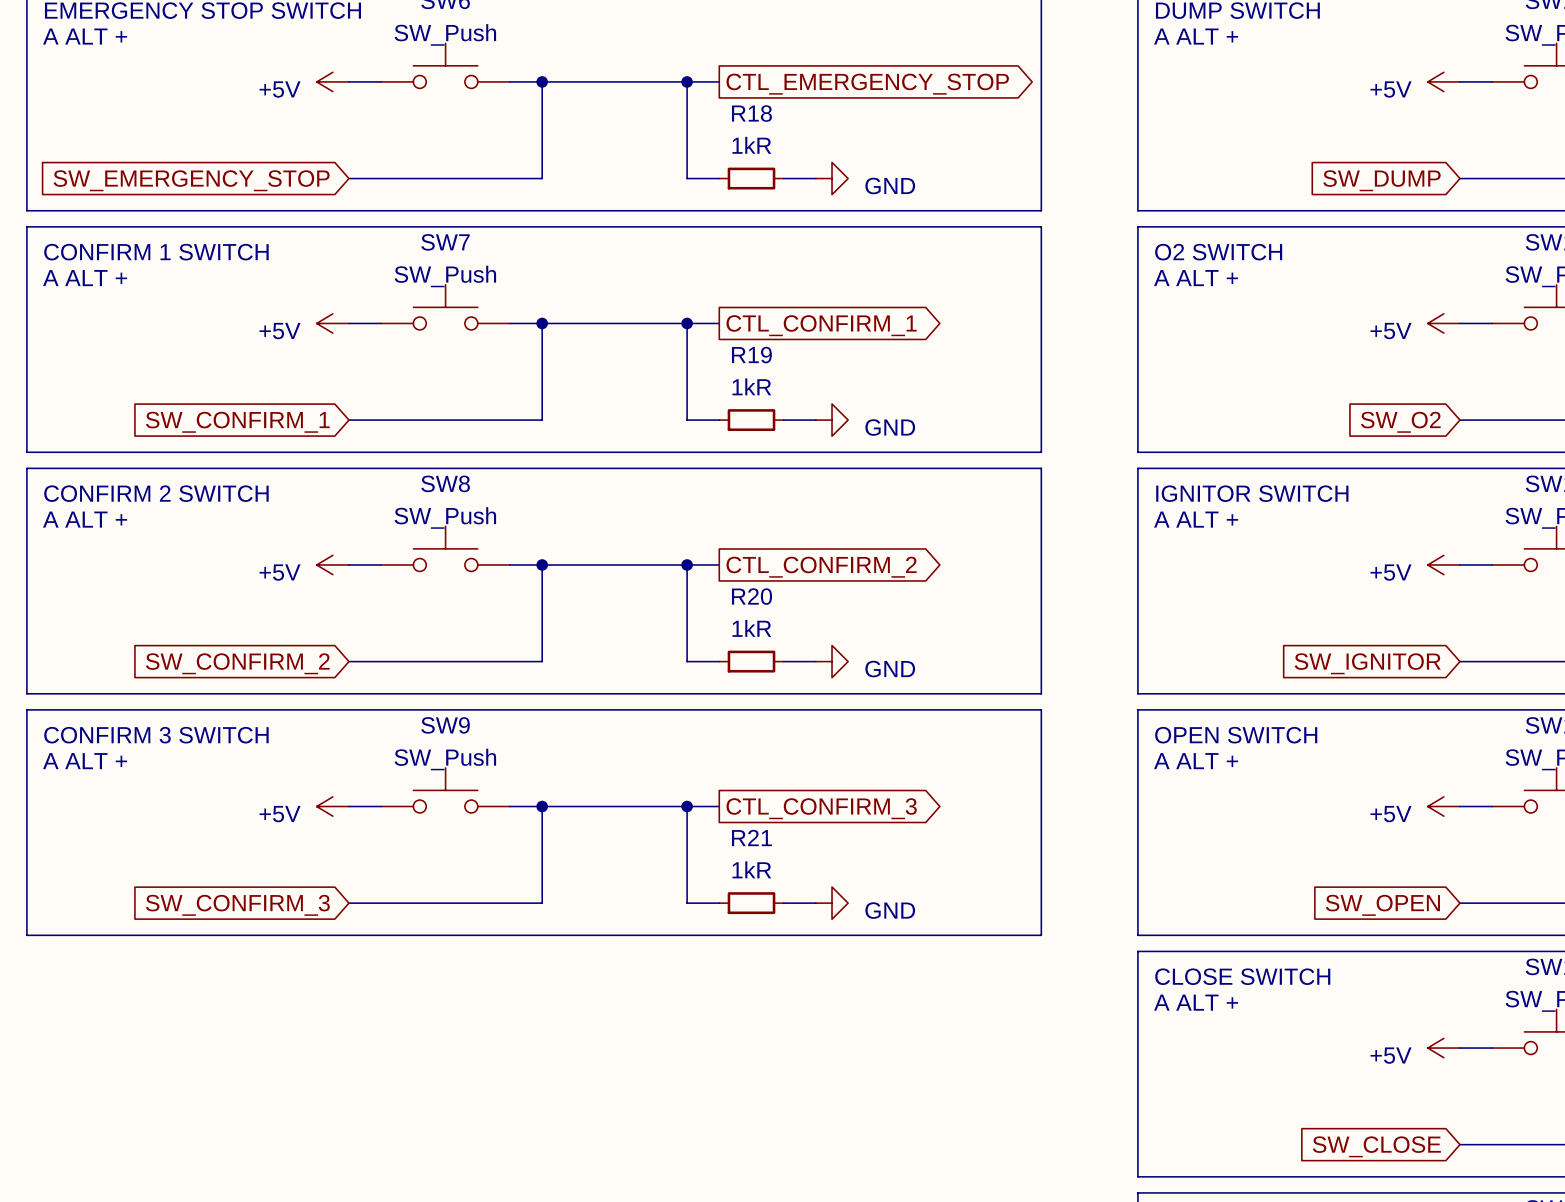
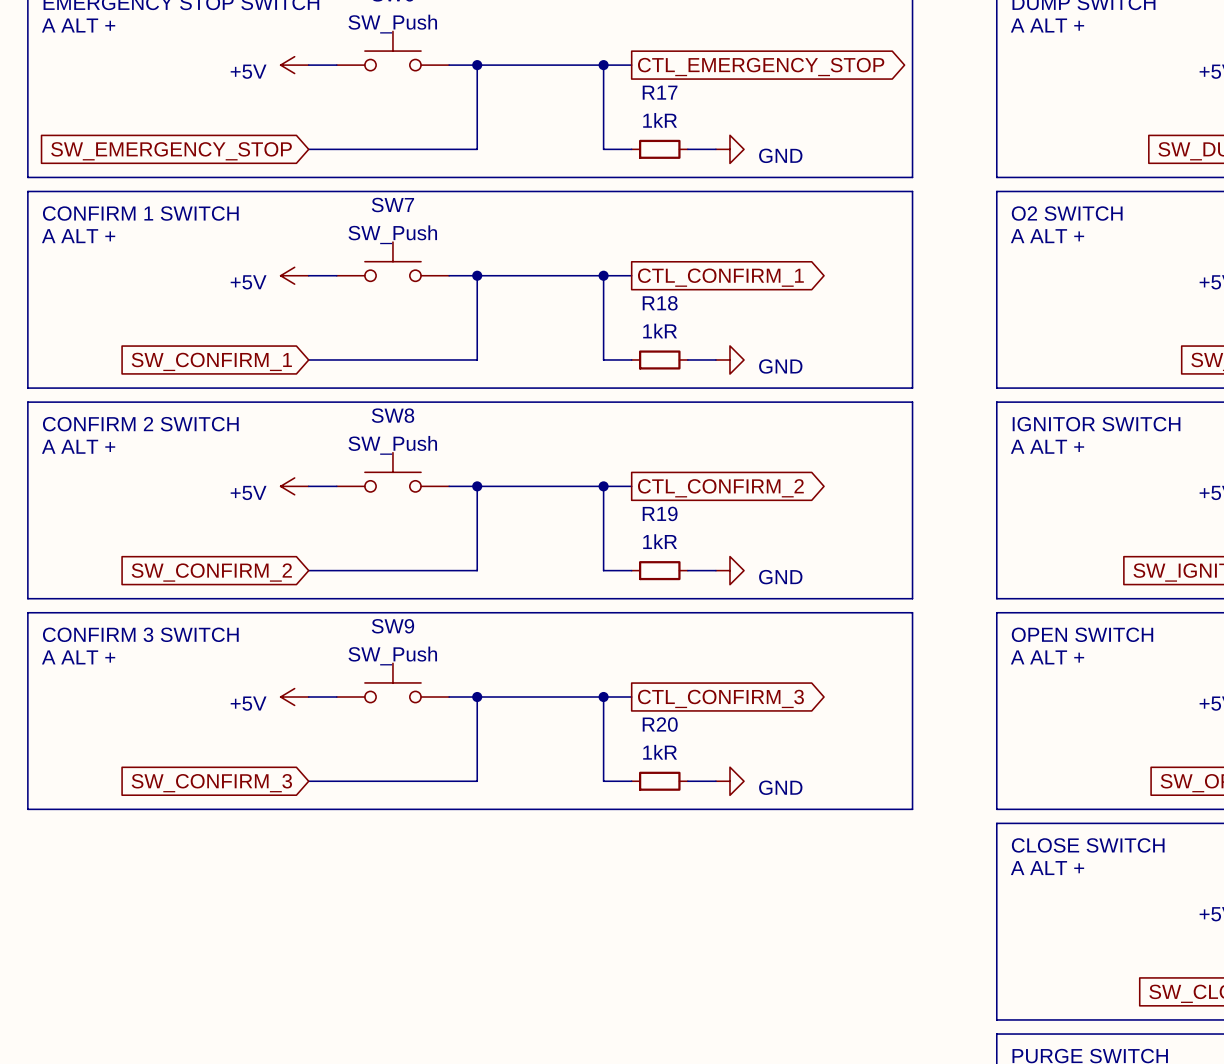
R18 name: R18 (751, 113) -> R17 (660, 92)
R19 name: R19 (751, 355) -> R18 (660, 303)
R20 name: R20 (752, 596) -> R19 (660, 513)
R21 name: R21 (751, 837) -> R20 (660, 724)

